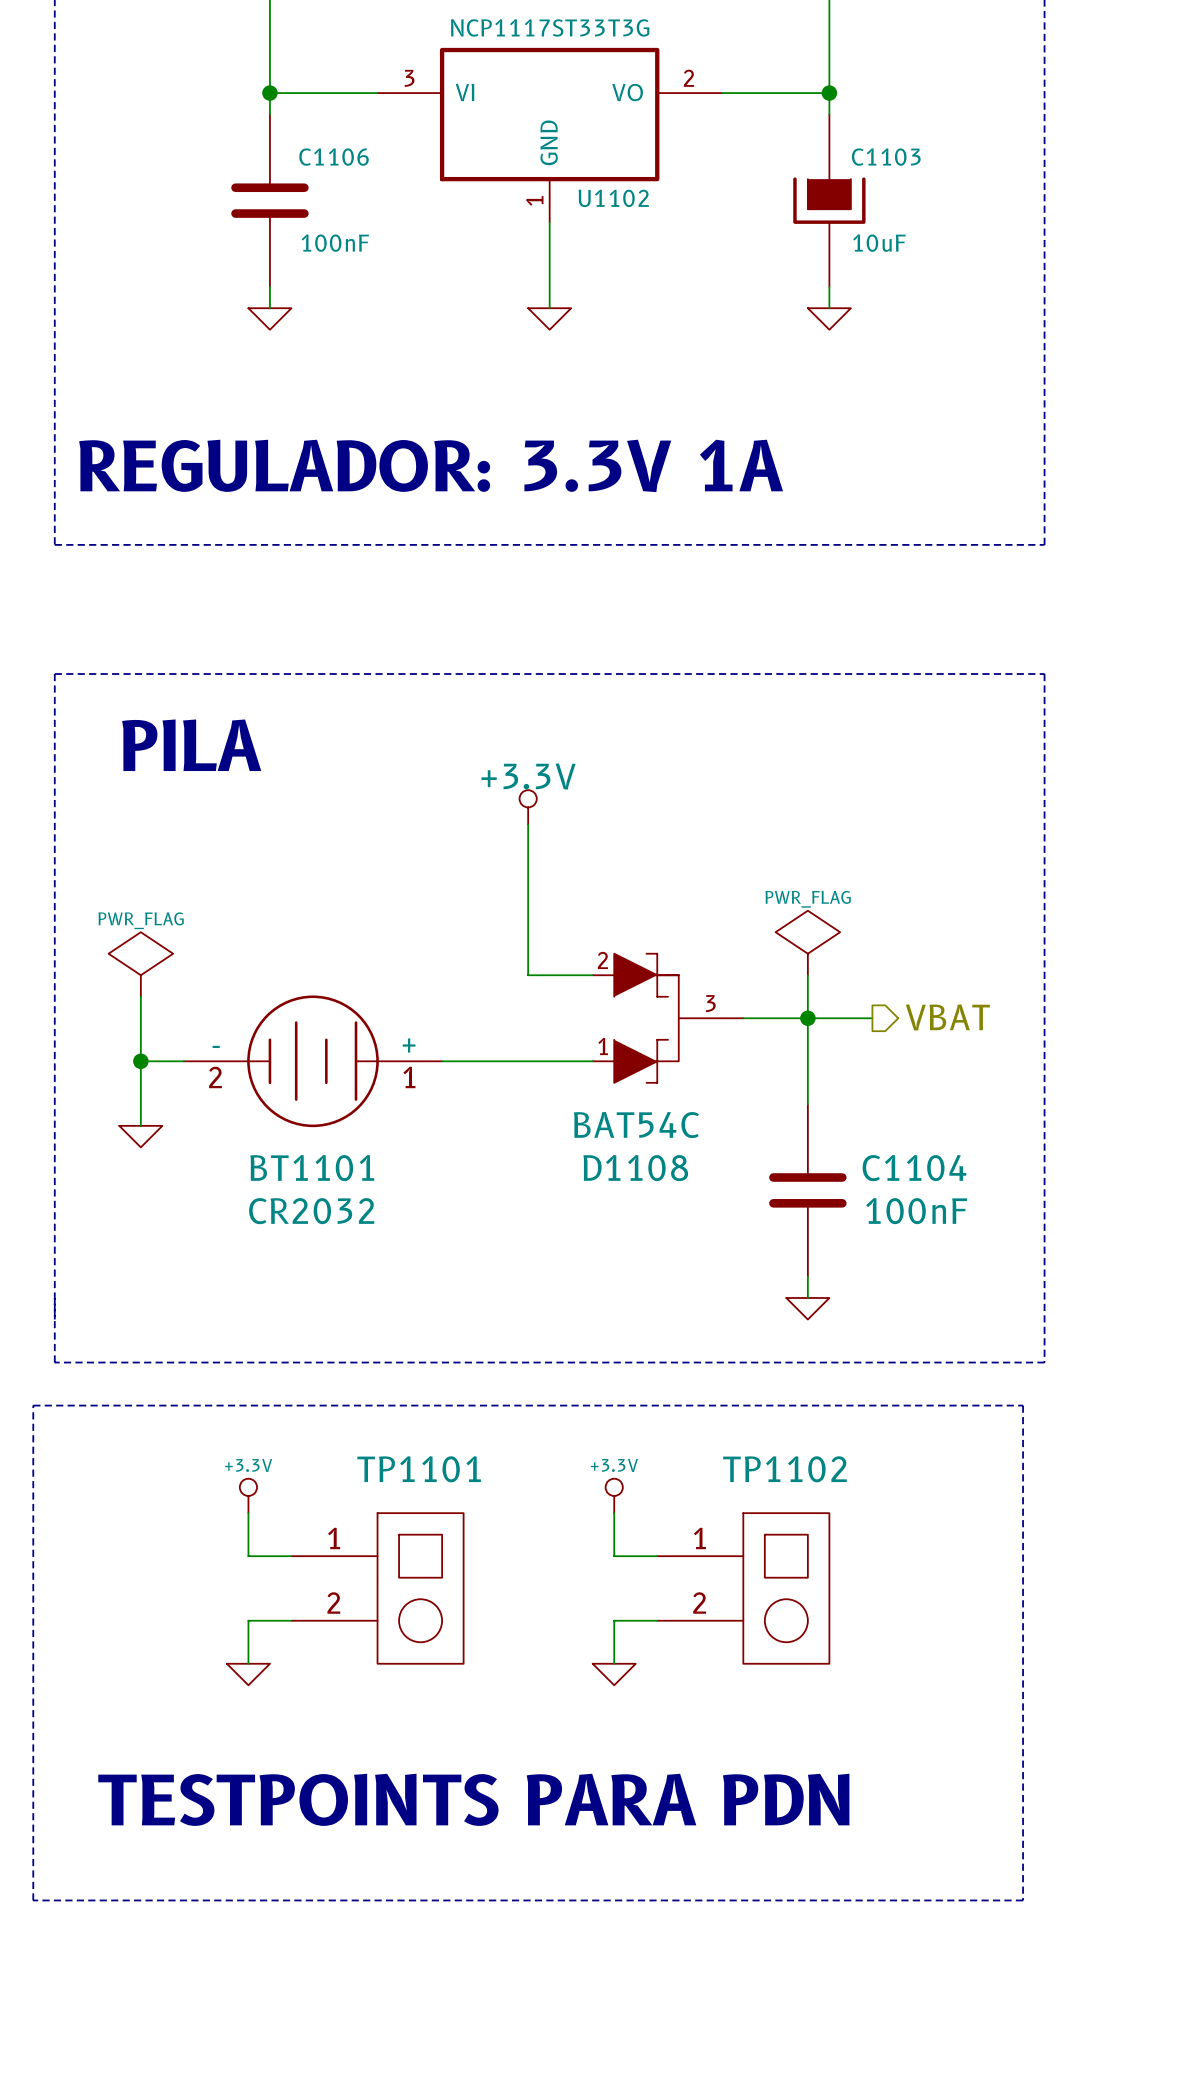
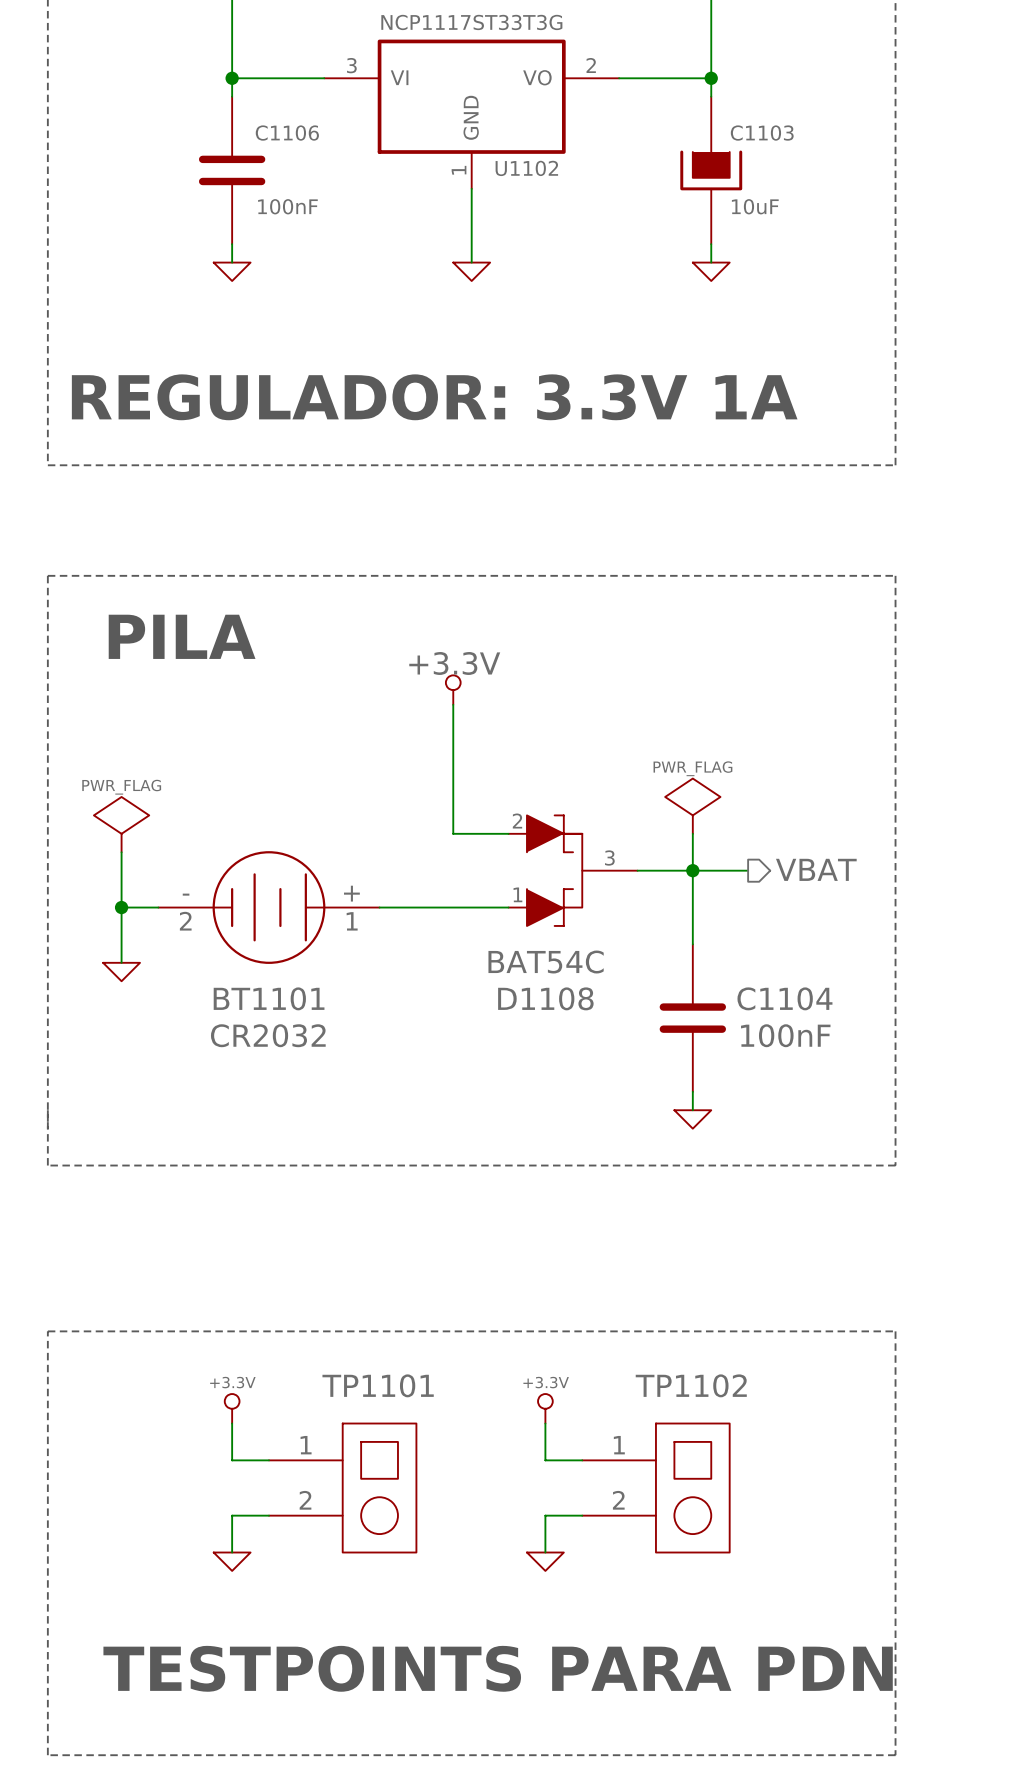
line: (33, 1405) (1023, 1405) (1023, 1900) (33, 1900) (33, 1405) -> (47, 1331) (895, 1331) (895, 1755) (47, 1755) (47, 1331)
power symbol position: +3.3V (248, 1495) -> +3.3V (232, 1408)
power symbol position: +3.3V (614, 1495) -> +3.3V (545, 1408)
wire: (248, 1513) (248, 1556) (291, 1556) -> (232, 1423) (232, 1460) (268, 1460)
wire: (614, 1513) (614, 1556) (657, 1556) -> (545, 1423) (545, 1460) (582, 1460)
TP1101 position: (377, 1588) -> (342, 1488)
TP1102 position: (743, 1588) -> (655, 1488)
wire: (291, 1620) (248, 1620) (248, 1663) -> (268, 1515) (232, 1515) (232, 1552)
wire: (657, 1620) (614, 1620) (614, 1663) -> (582, 1515) (545, 1515) (545, 1552)
power symbol position: (248, 1674) -> (232, 1561)
power symbol position: (614, 1674) -> (545, 1561)
text position: TESTPOINTS PARA PDN (473, 1799) -> TESTPOINTS PARA PDN (498, 1668)

